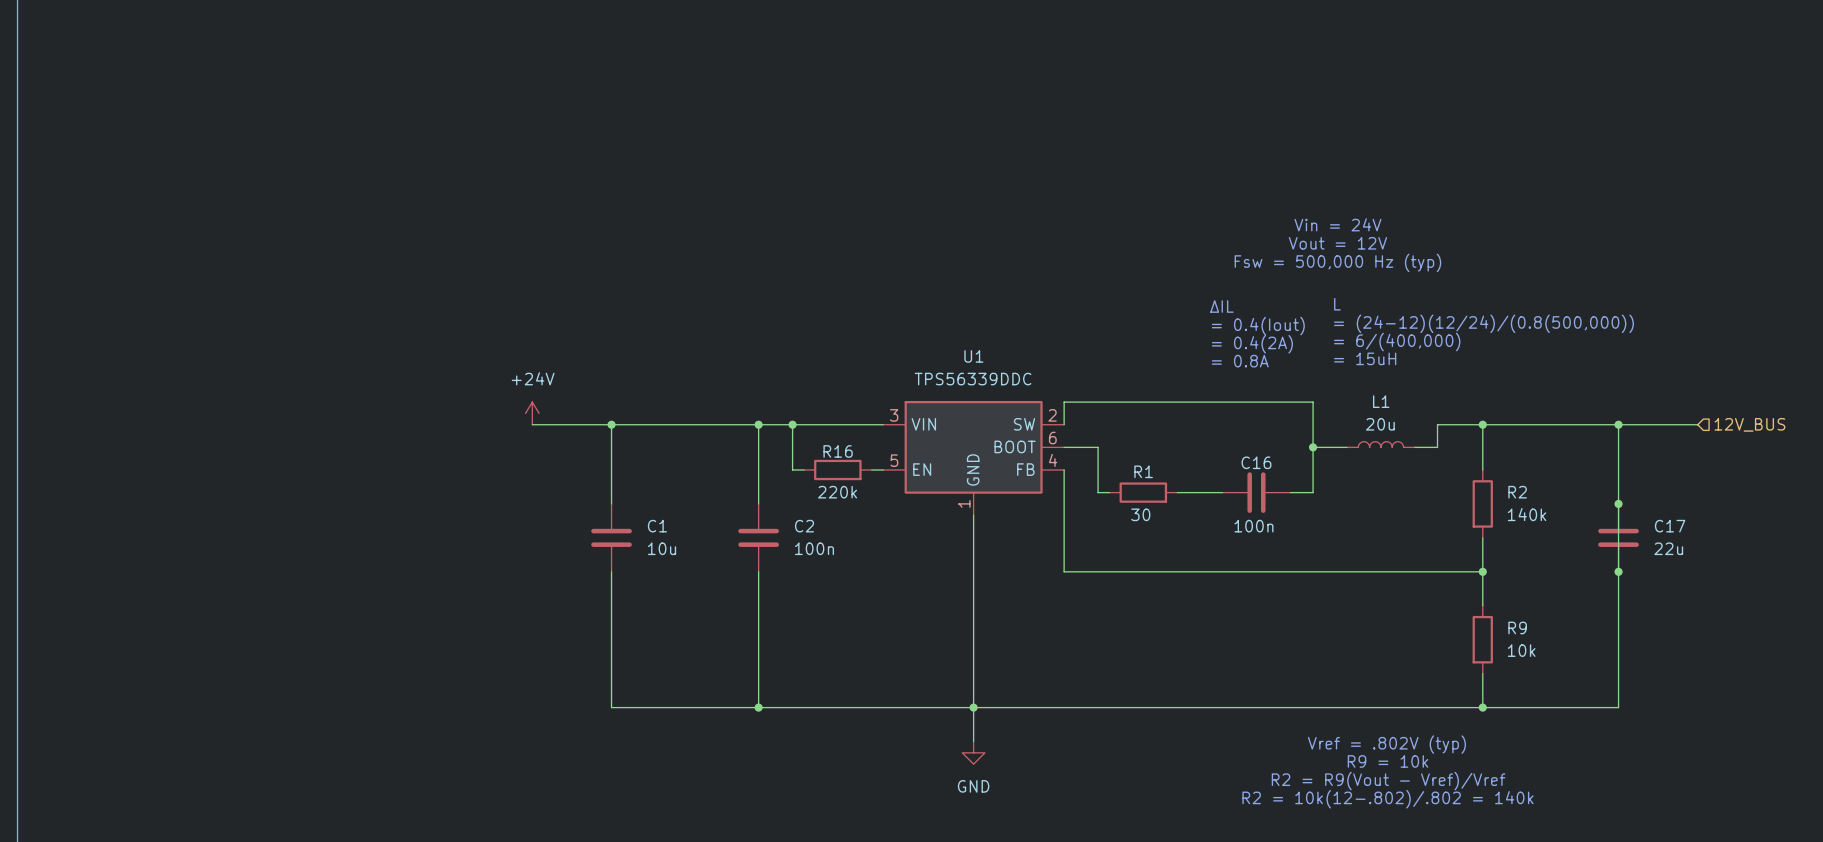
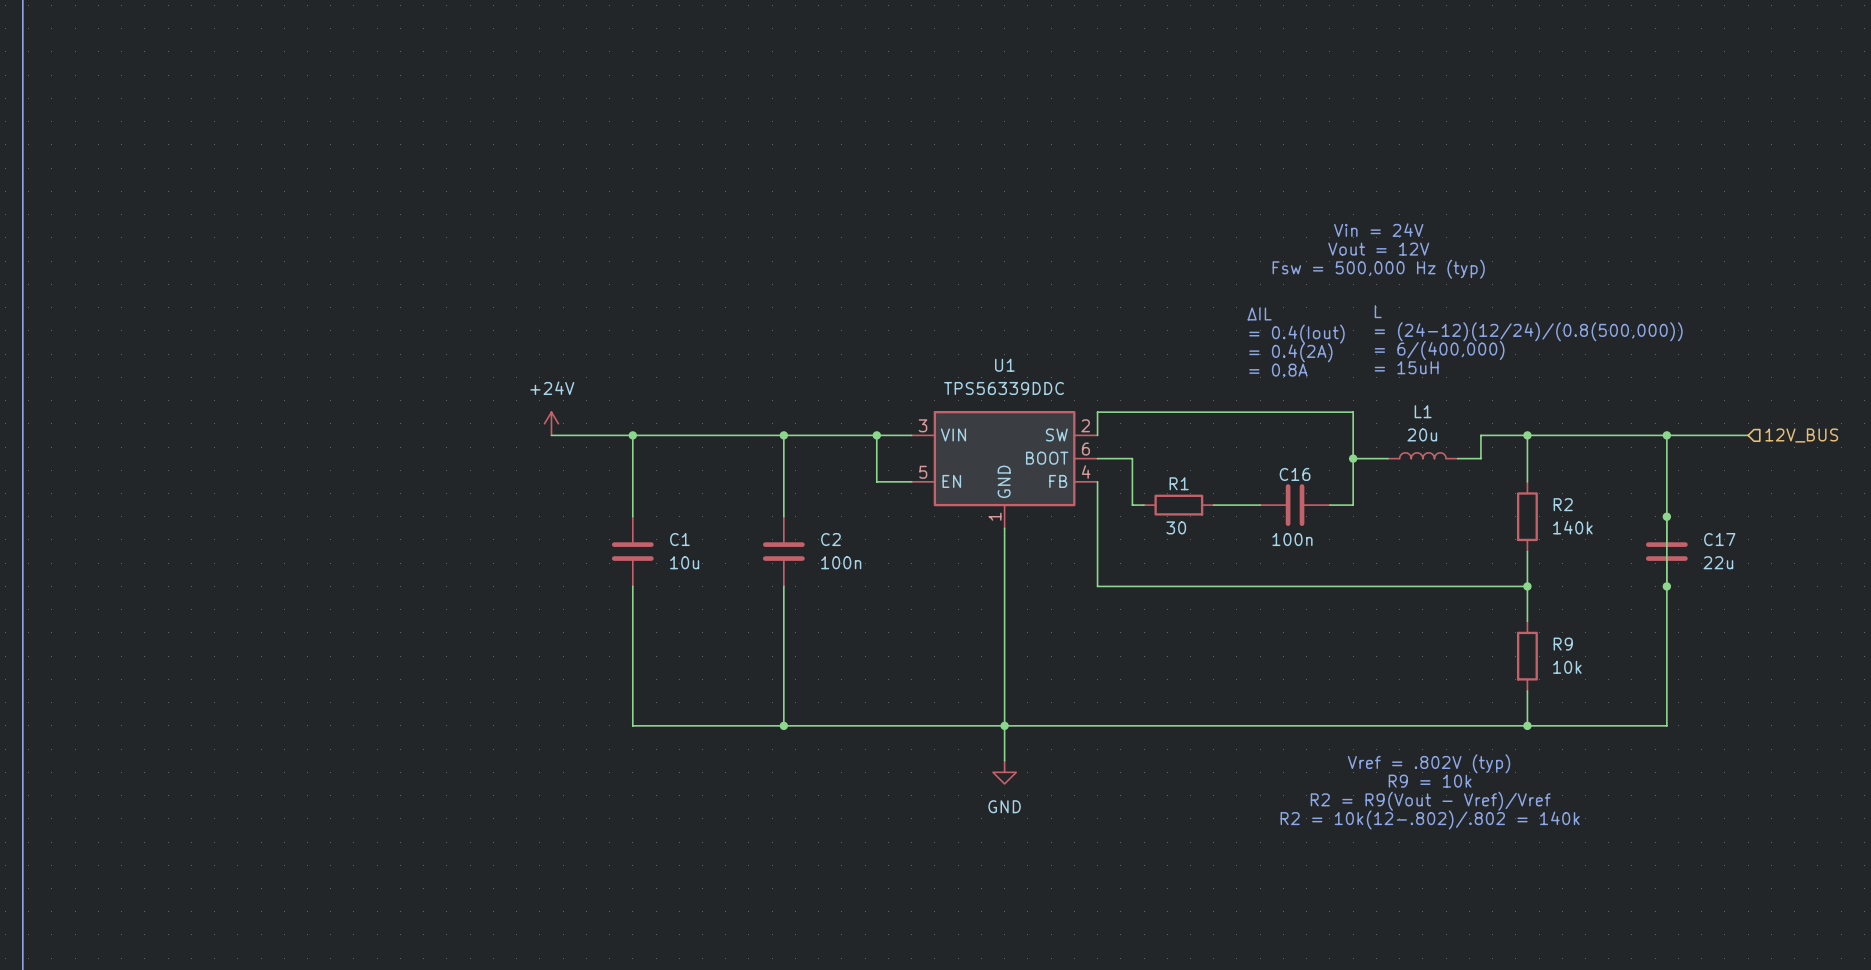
wire: (792, 424) (792, 469) (803, 469) -> none
junction: (792, 424) -> none
wire: none -> (876, 435) (876, 481) (900, 481)
junction: none -> (876, 435)
R16: 220k (837, 469) -> none

